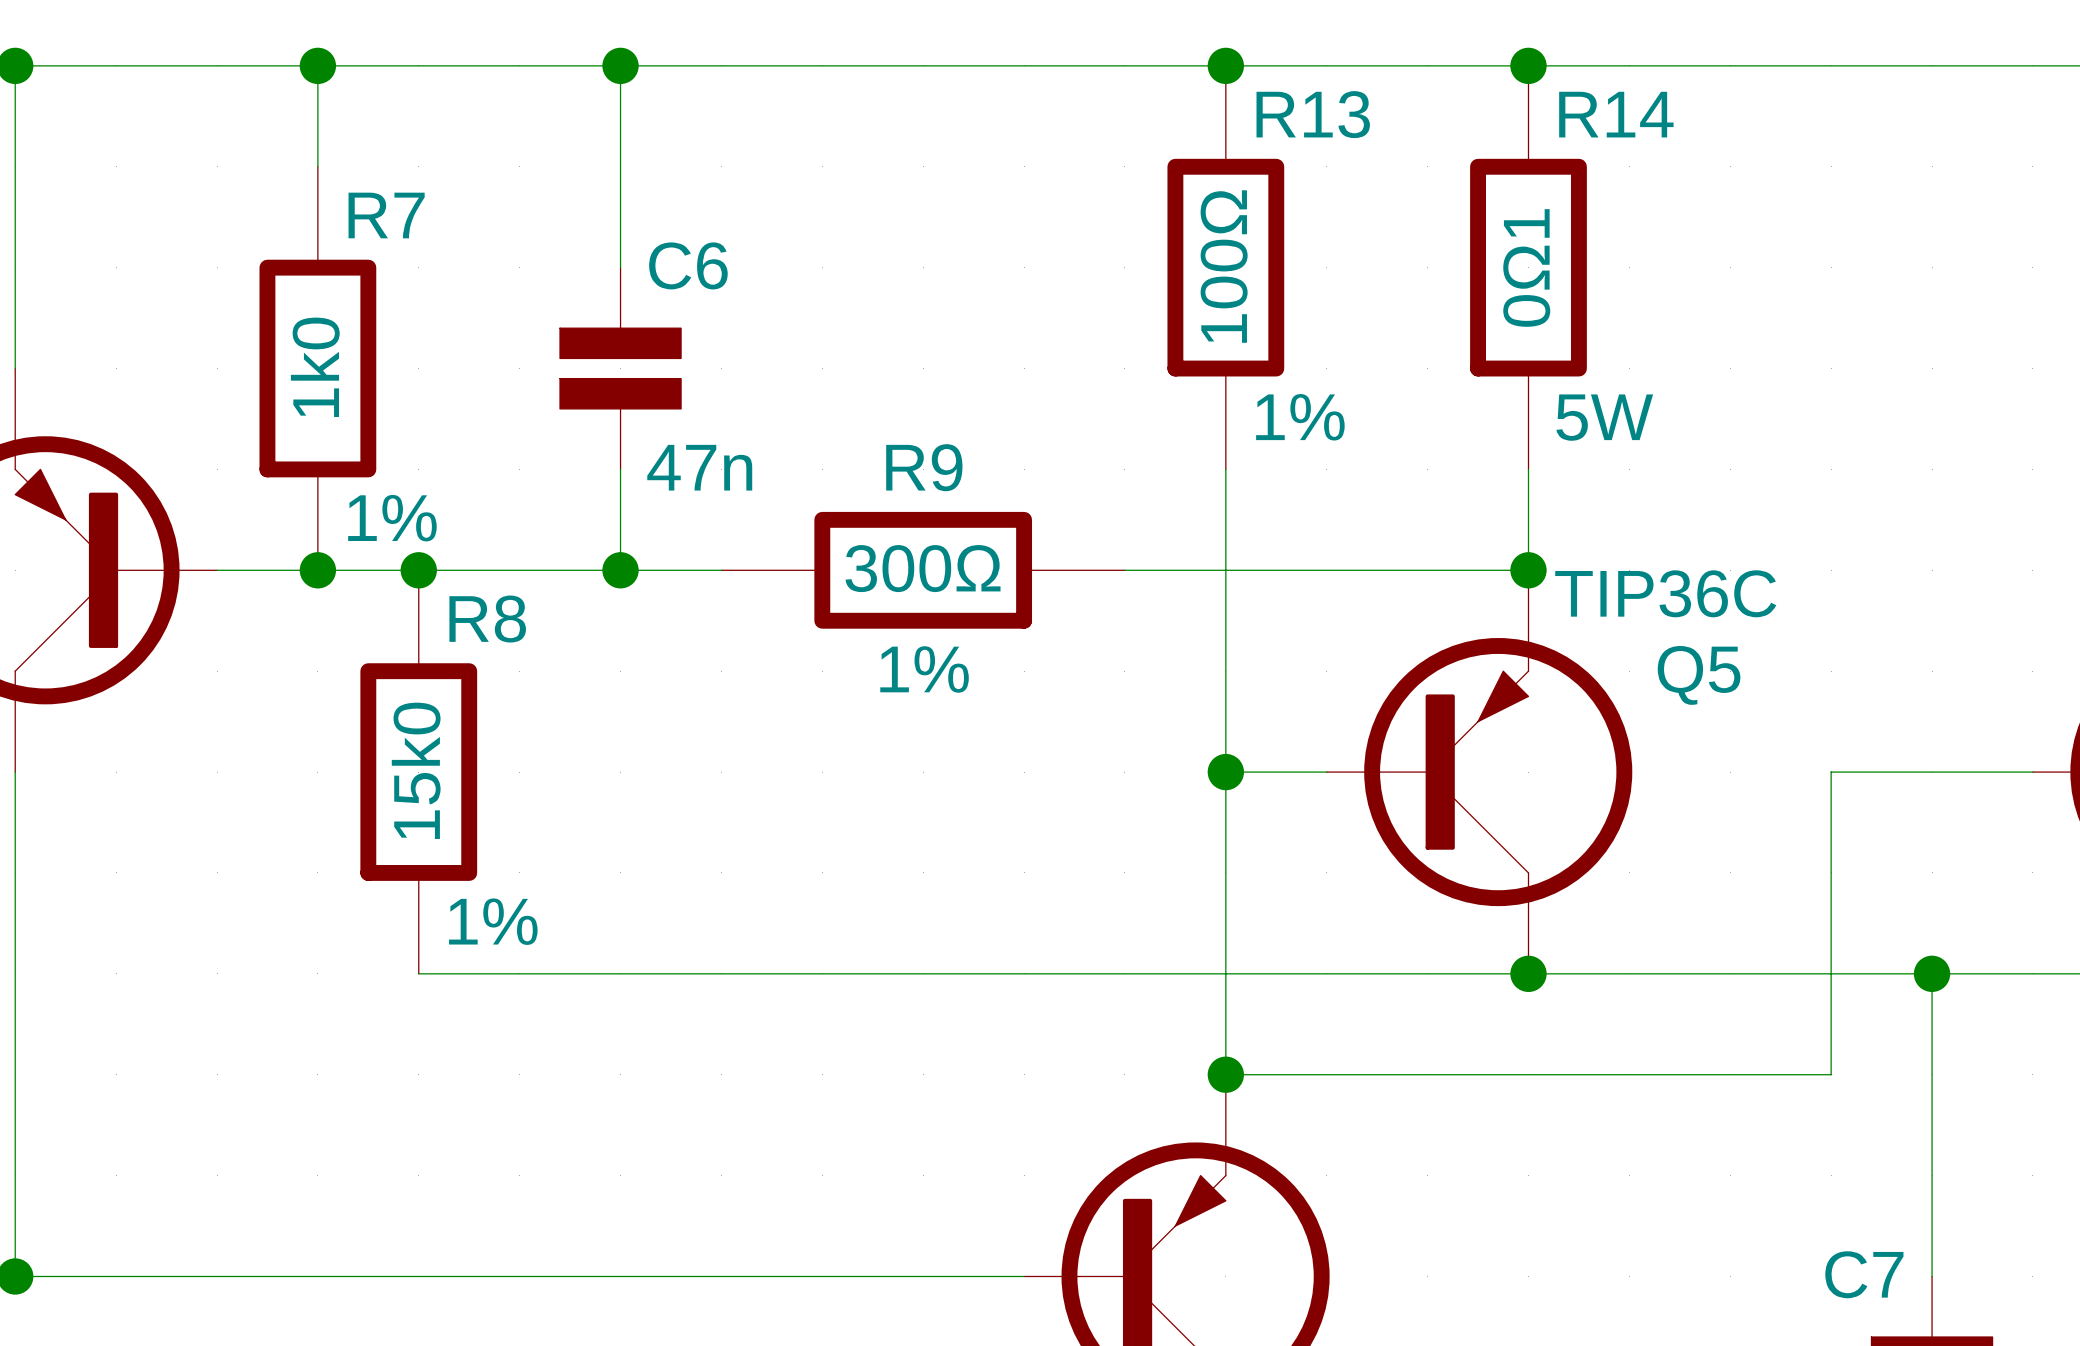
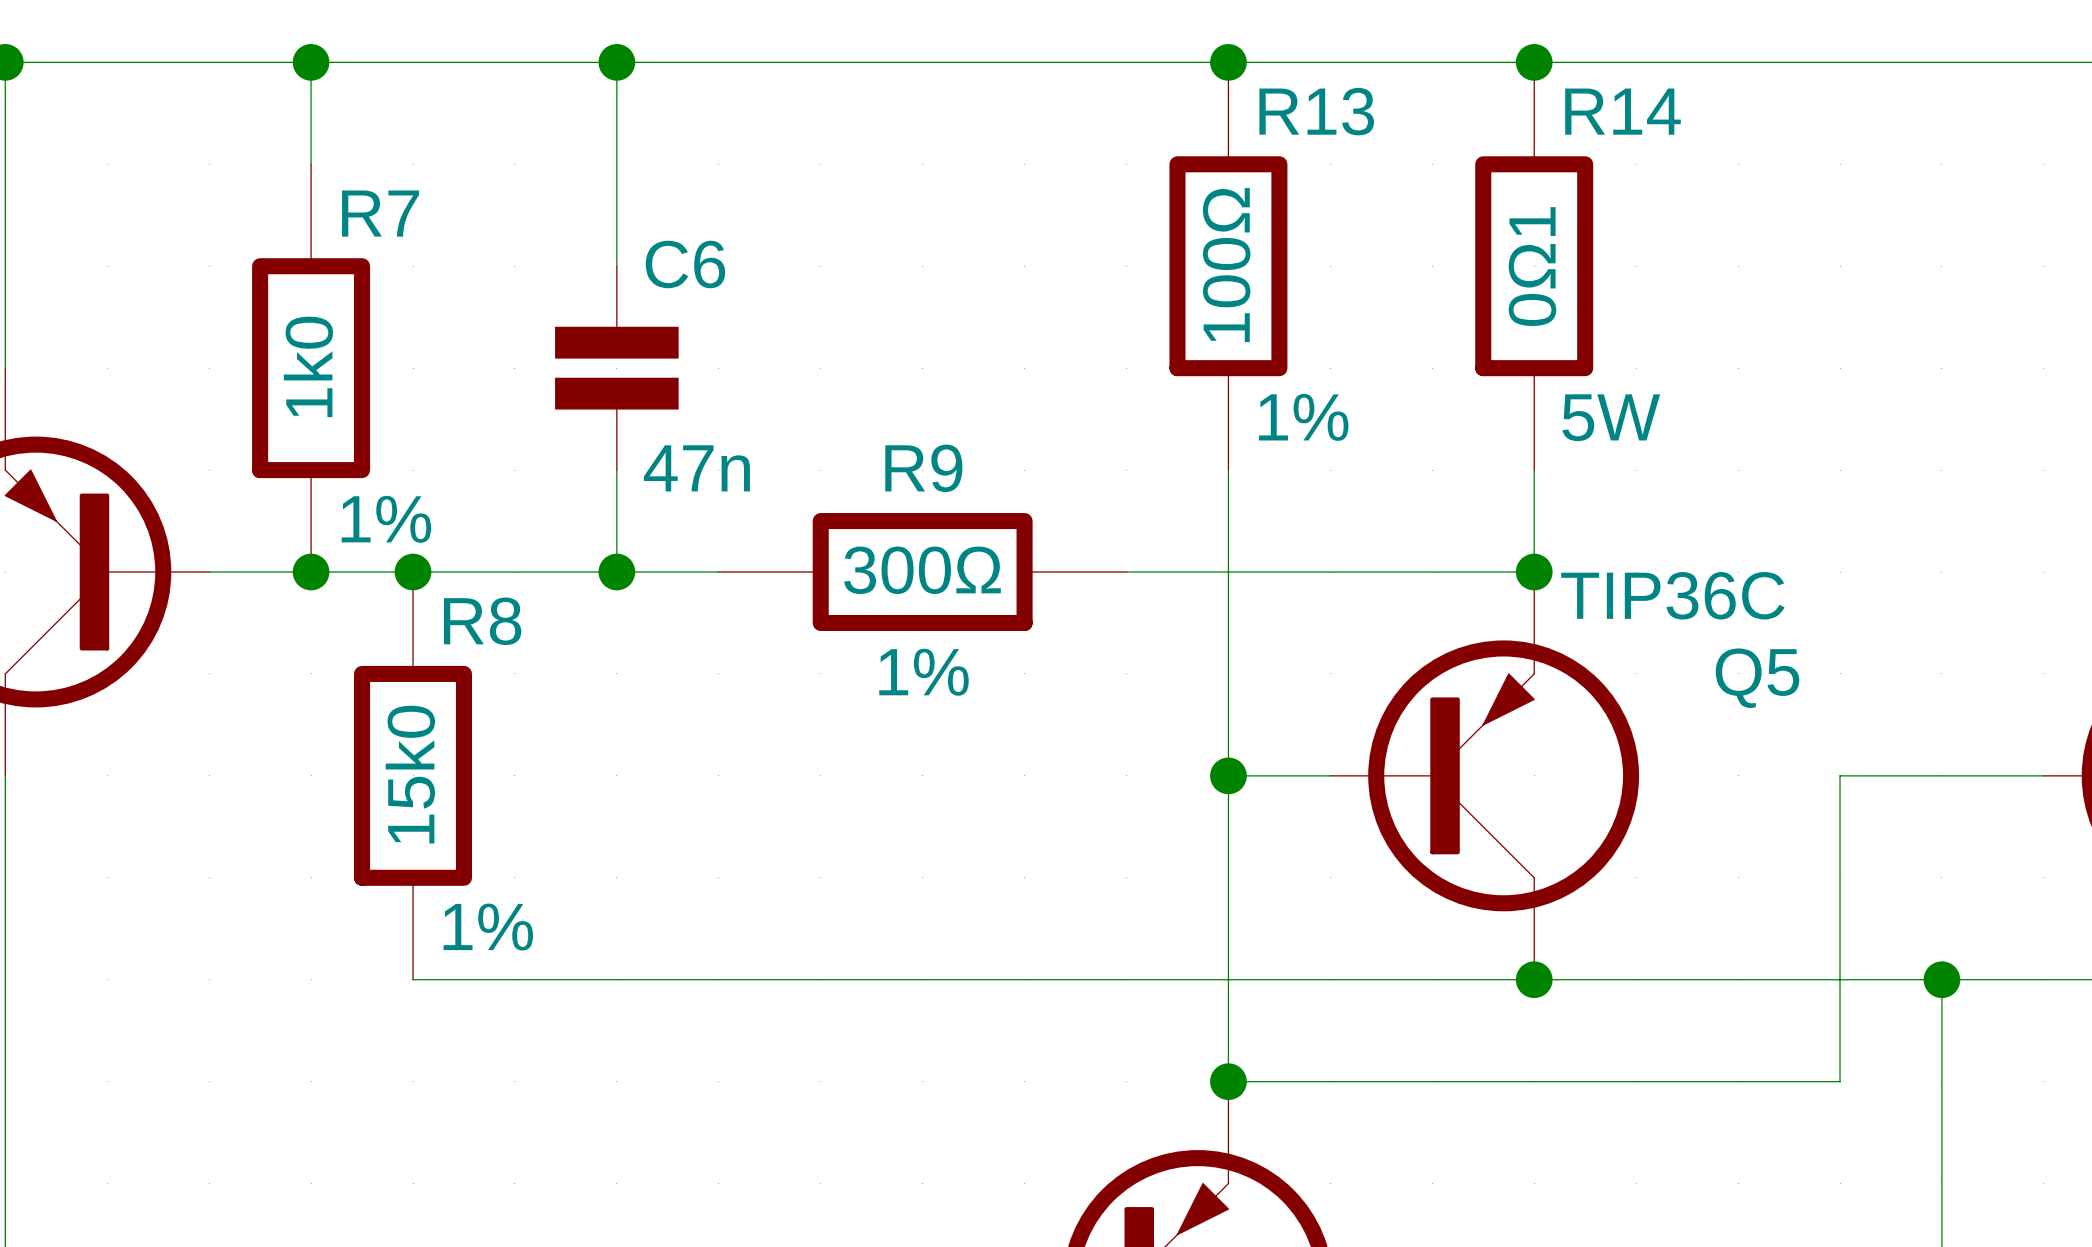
Q5 name position: Q5 (1699, 675) -> Q5 (1757, 678)

